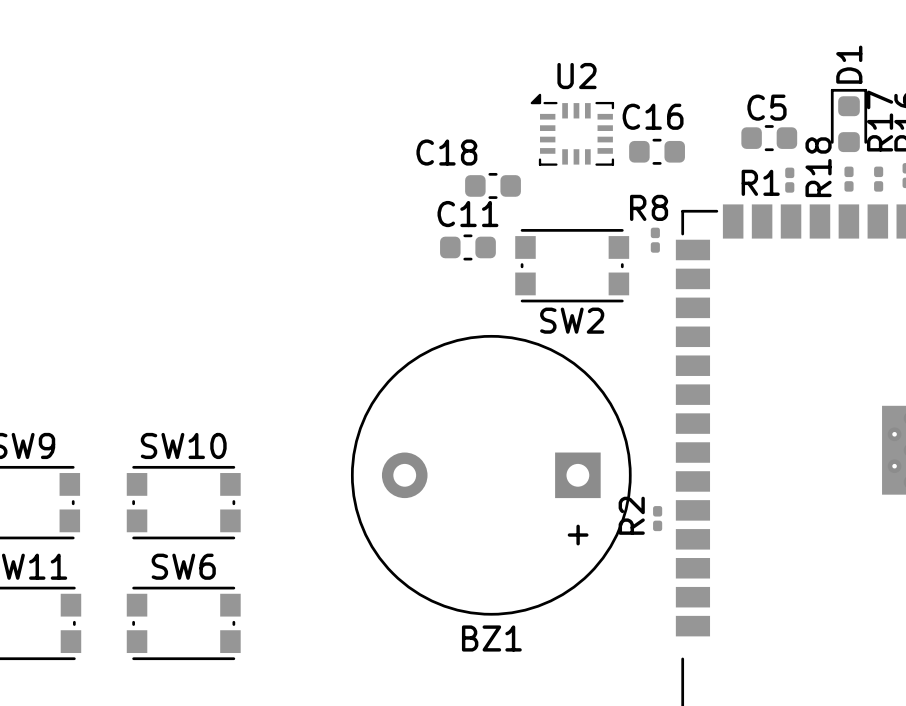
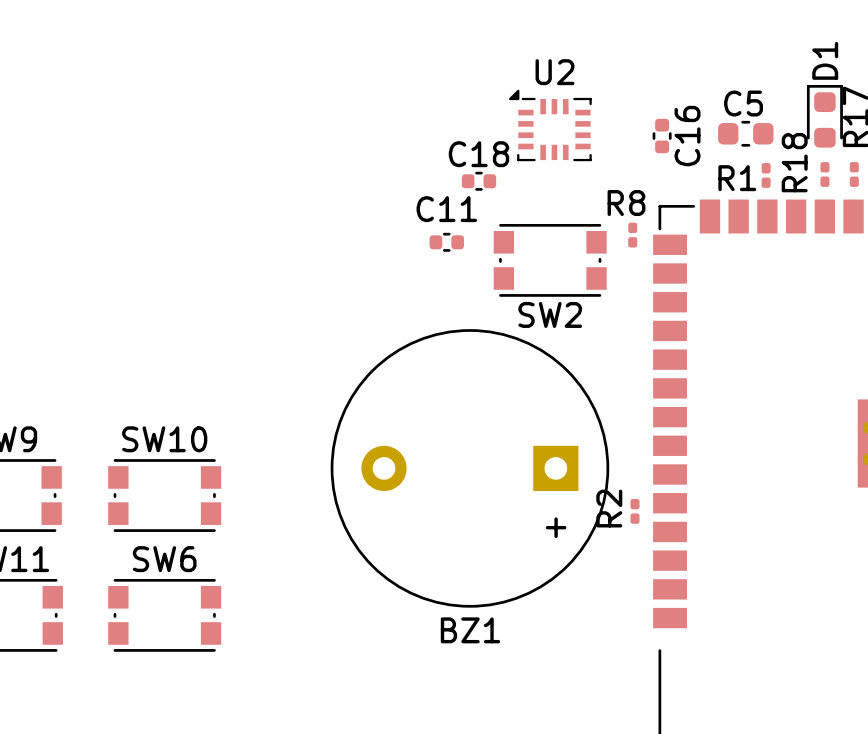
C16 name position: C16 (653, 116) -> C16 (687, 136)
C16 footprint: [629, 138, 685, 165] -> [652, 118, 672, 154]
C18 name position: C18 (446, 152) -> C18 (478, 154)
C18 footprint: [465, 172, 521, 199] -> [461, 171, 497, 191]
C11 footprint: [440, 234, 496, 261] -> [429, 232, 464, 252]

